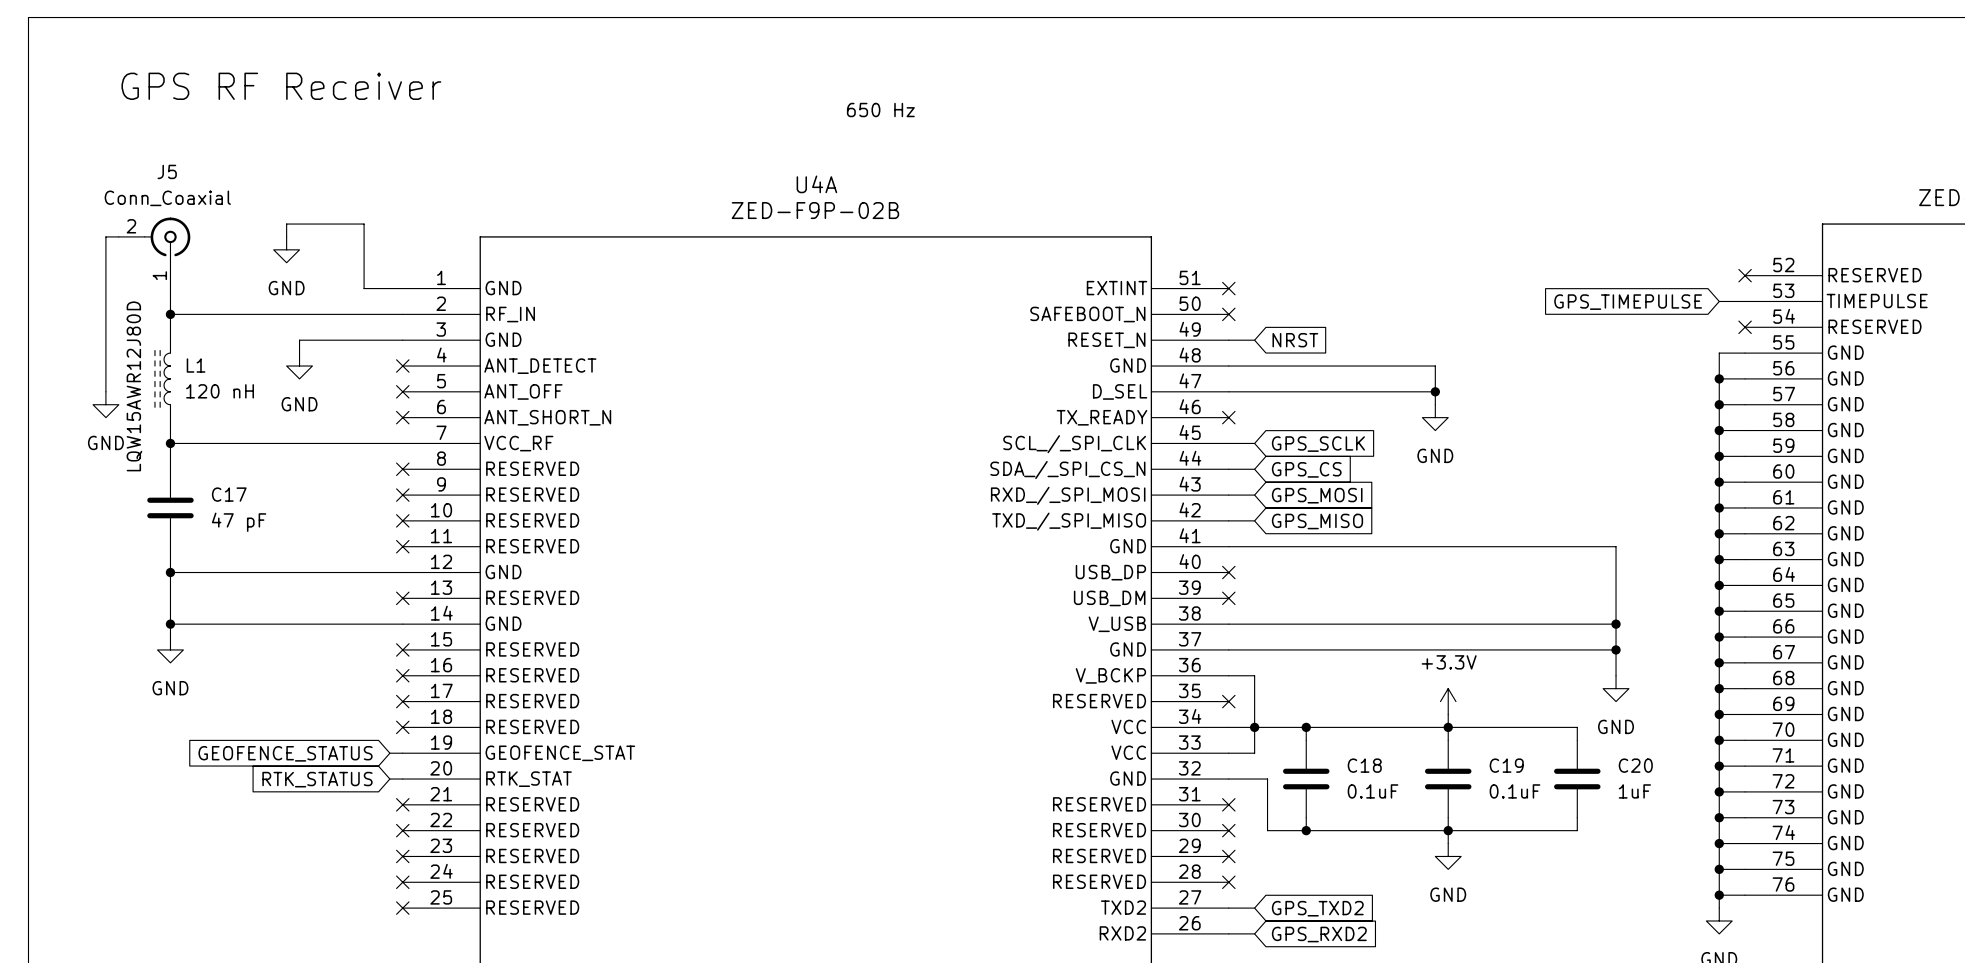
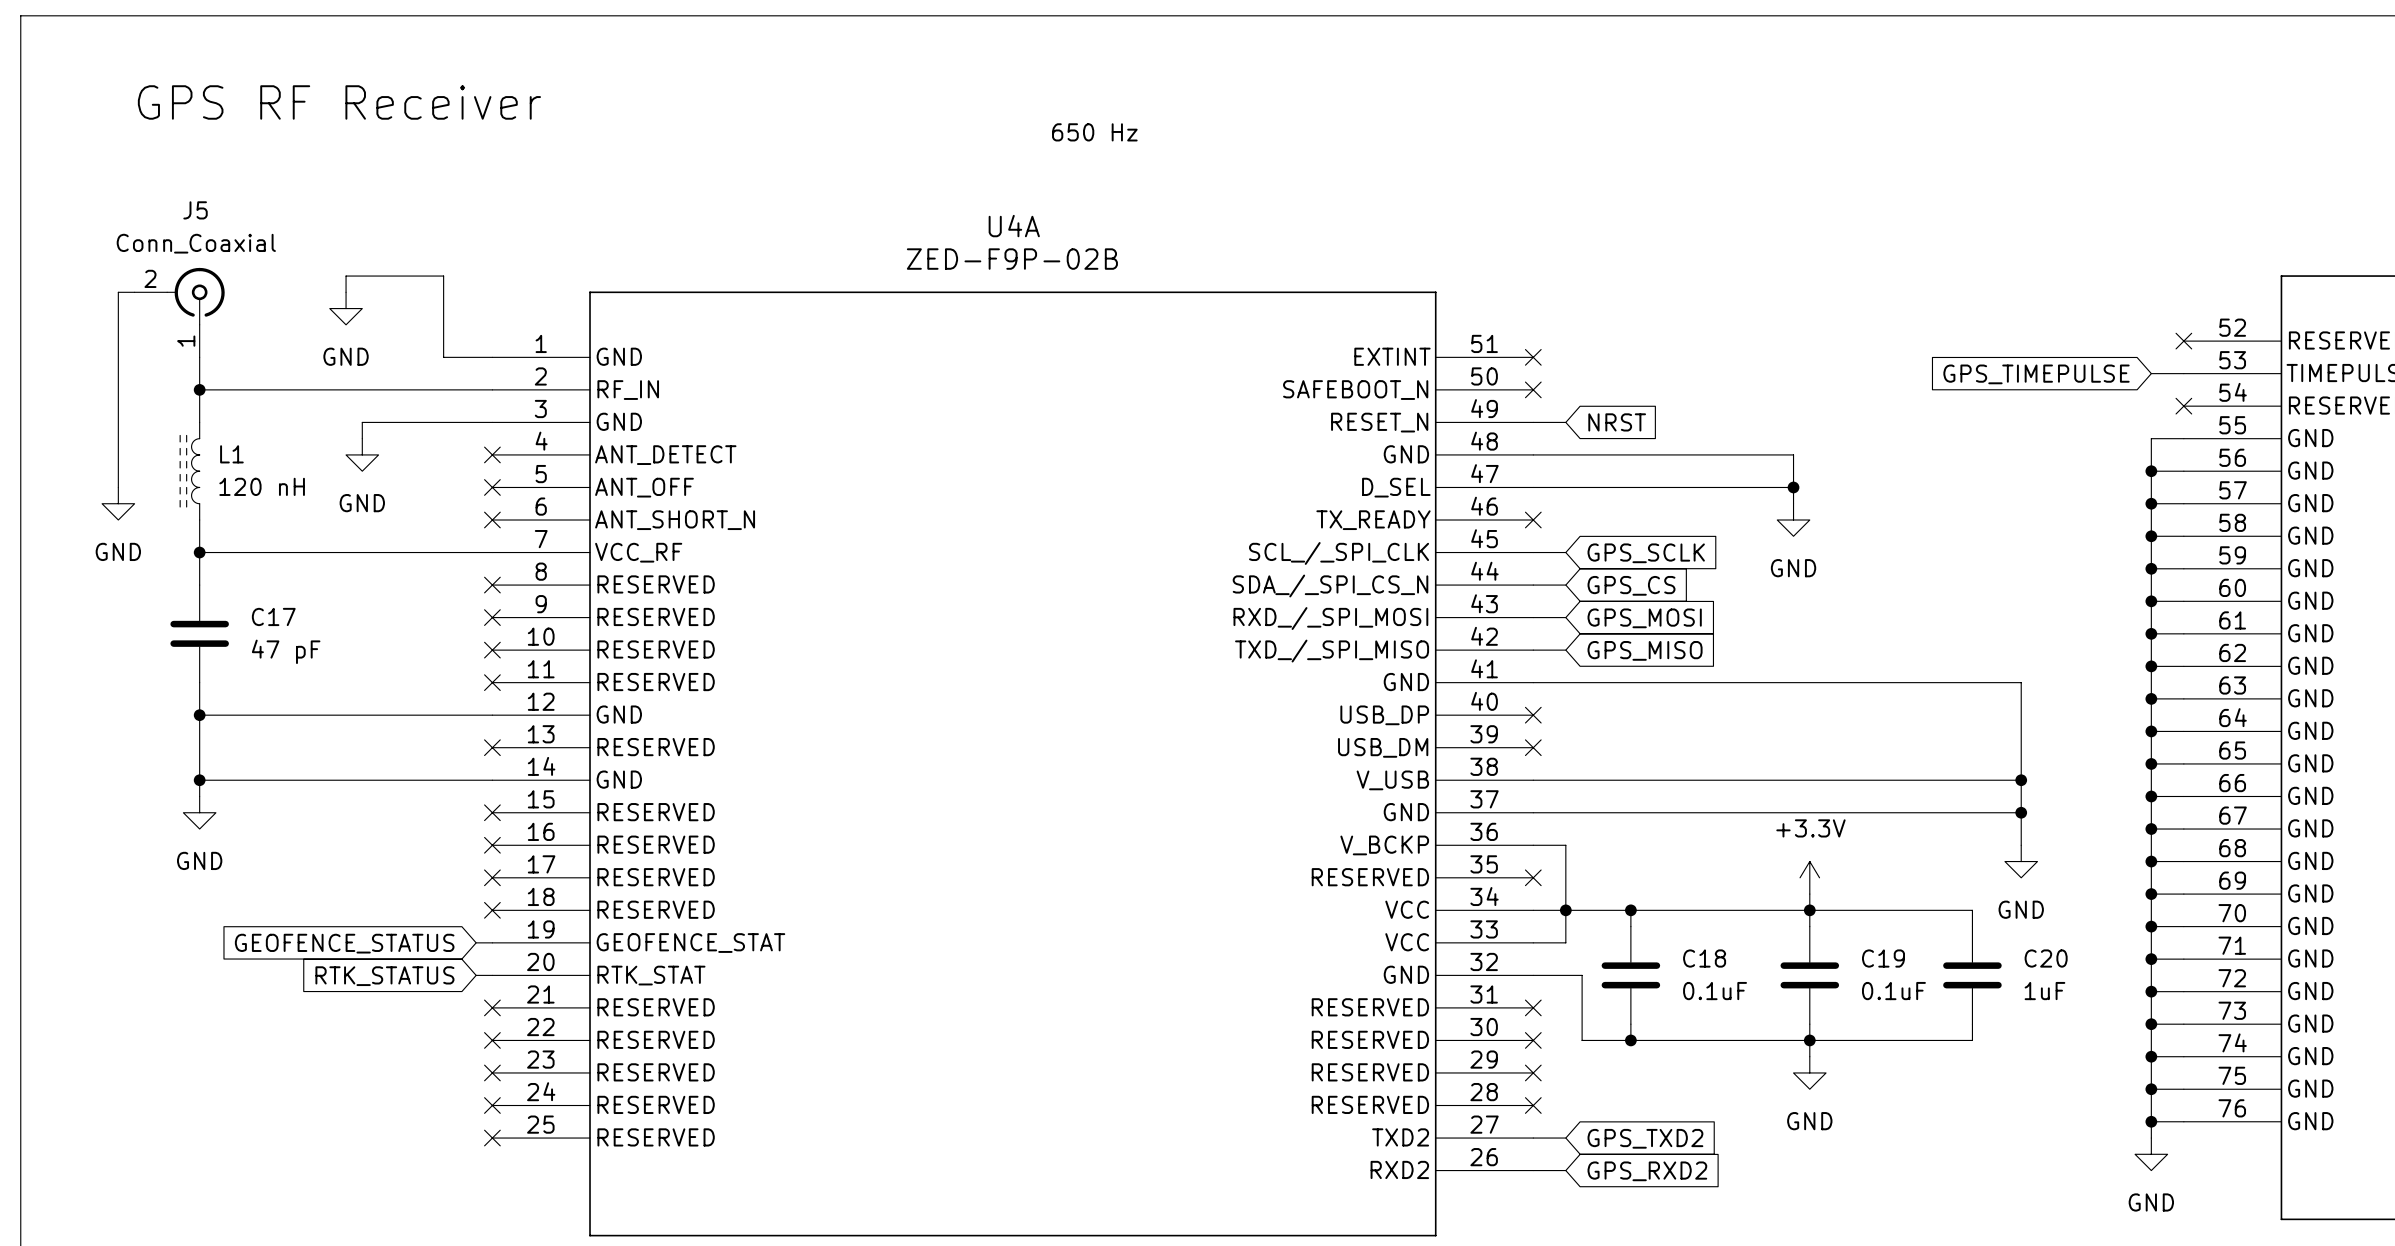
text: LQW15AWR12J80D (134, 386) -> none

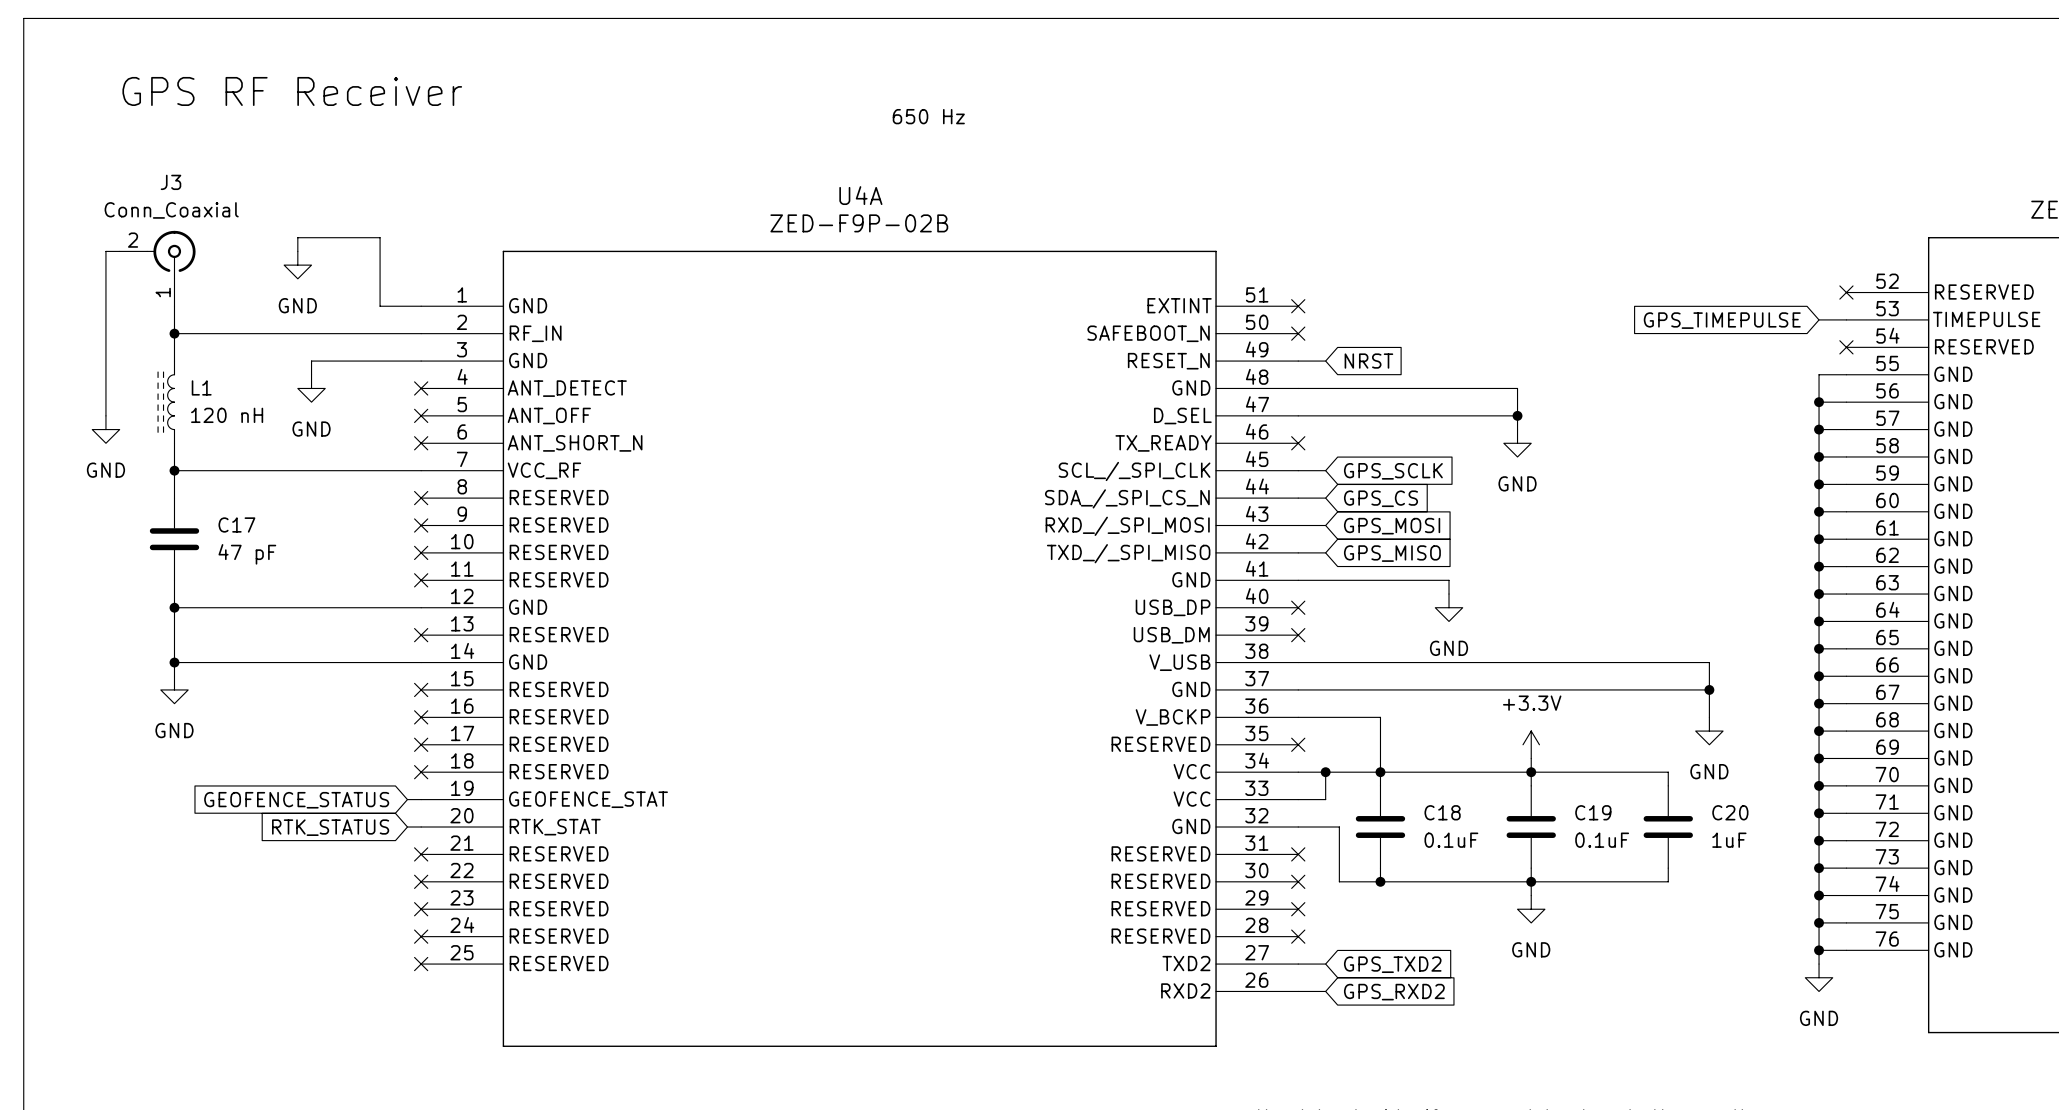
J5 name: J5 (195, 210) -> J3 (171, 182)
wire: (1712, 682) (2021, 682) (2021, 780) -> (1449, 580) (1449, 594)
power symbol: none -> GND (1449, 607)
junction: (2021, 780) -> none
wire: (1565, 845) (1565, 910) -> (1325, 717) (1380, 717) (1380, 772)

